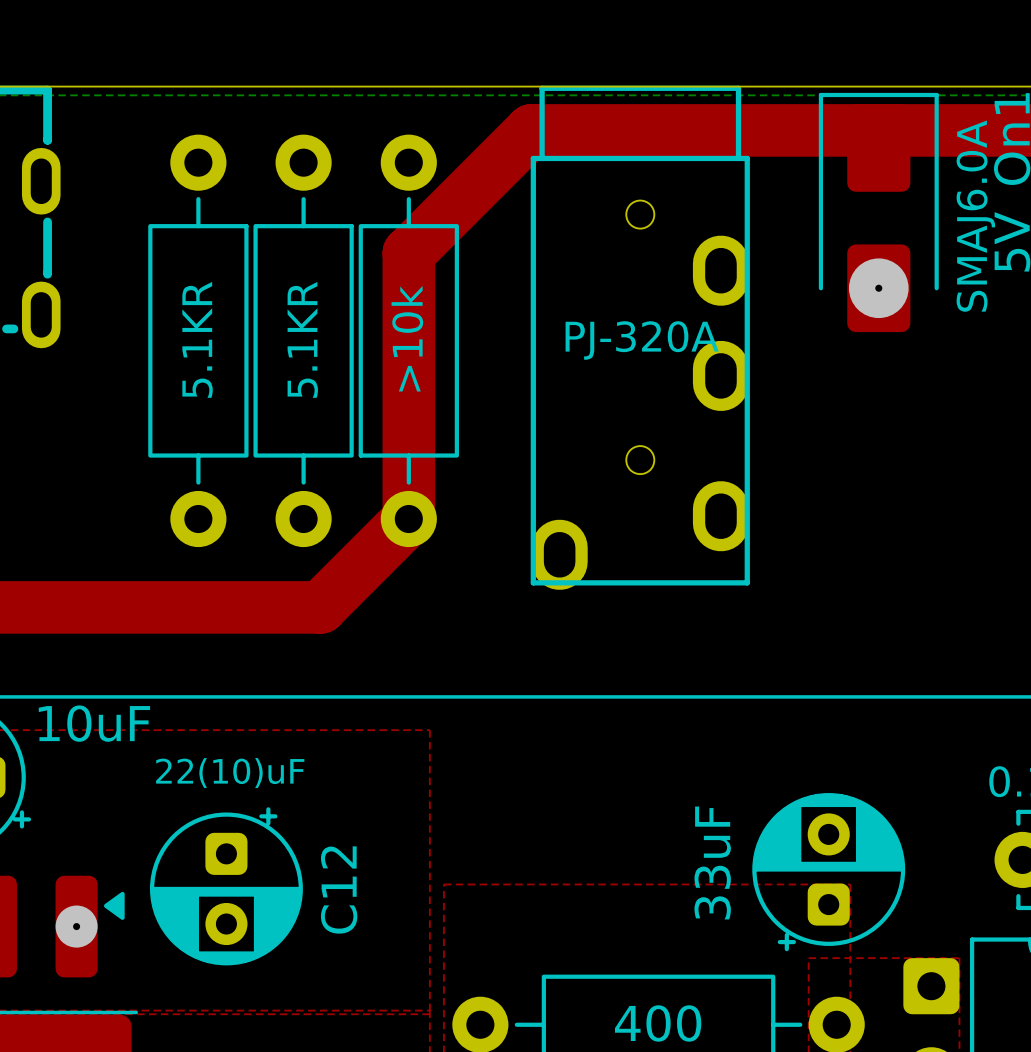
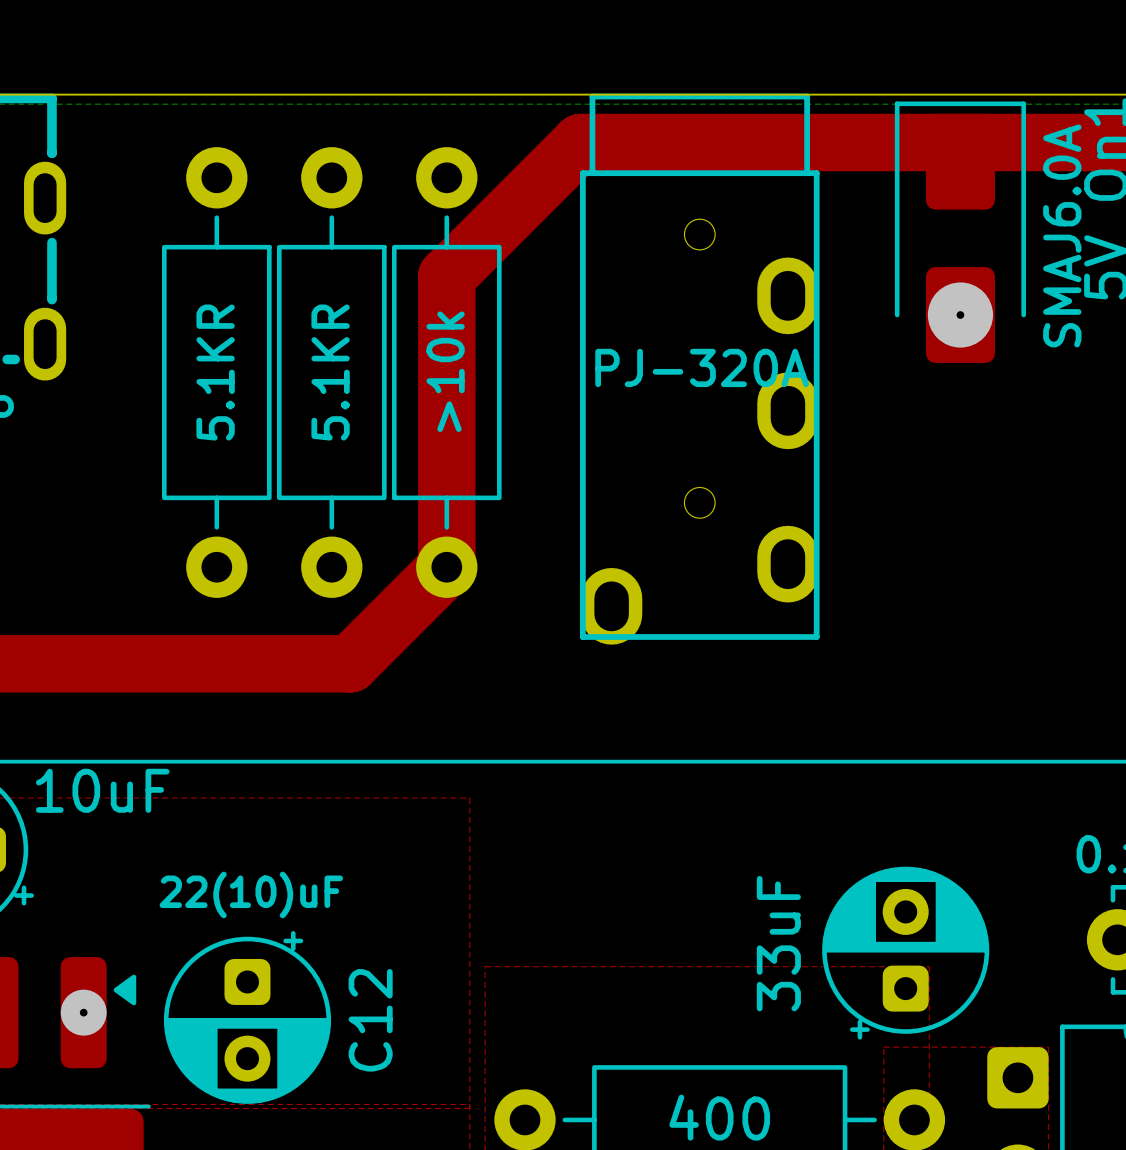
C12 position: (226, 886) -> (247, 1017)

